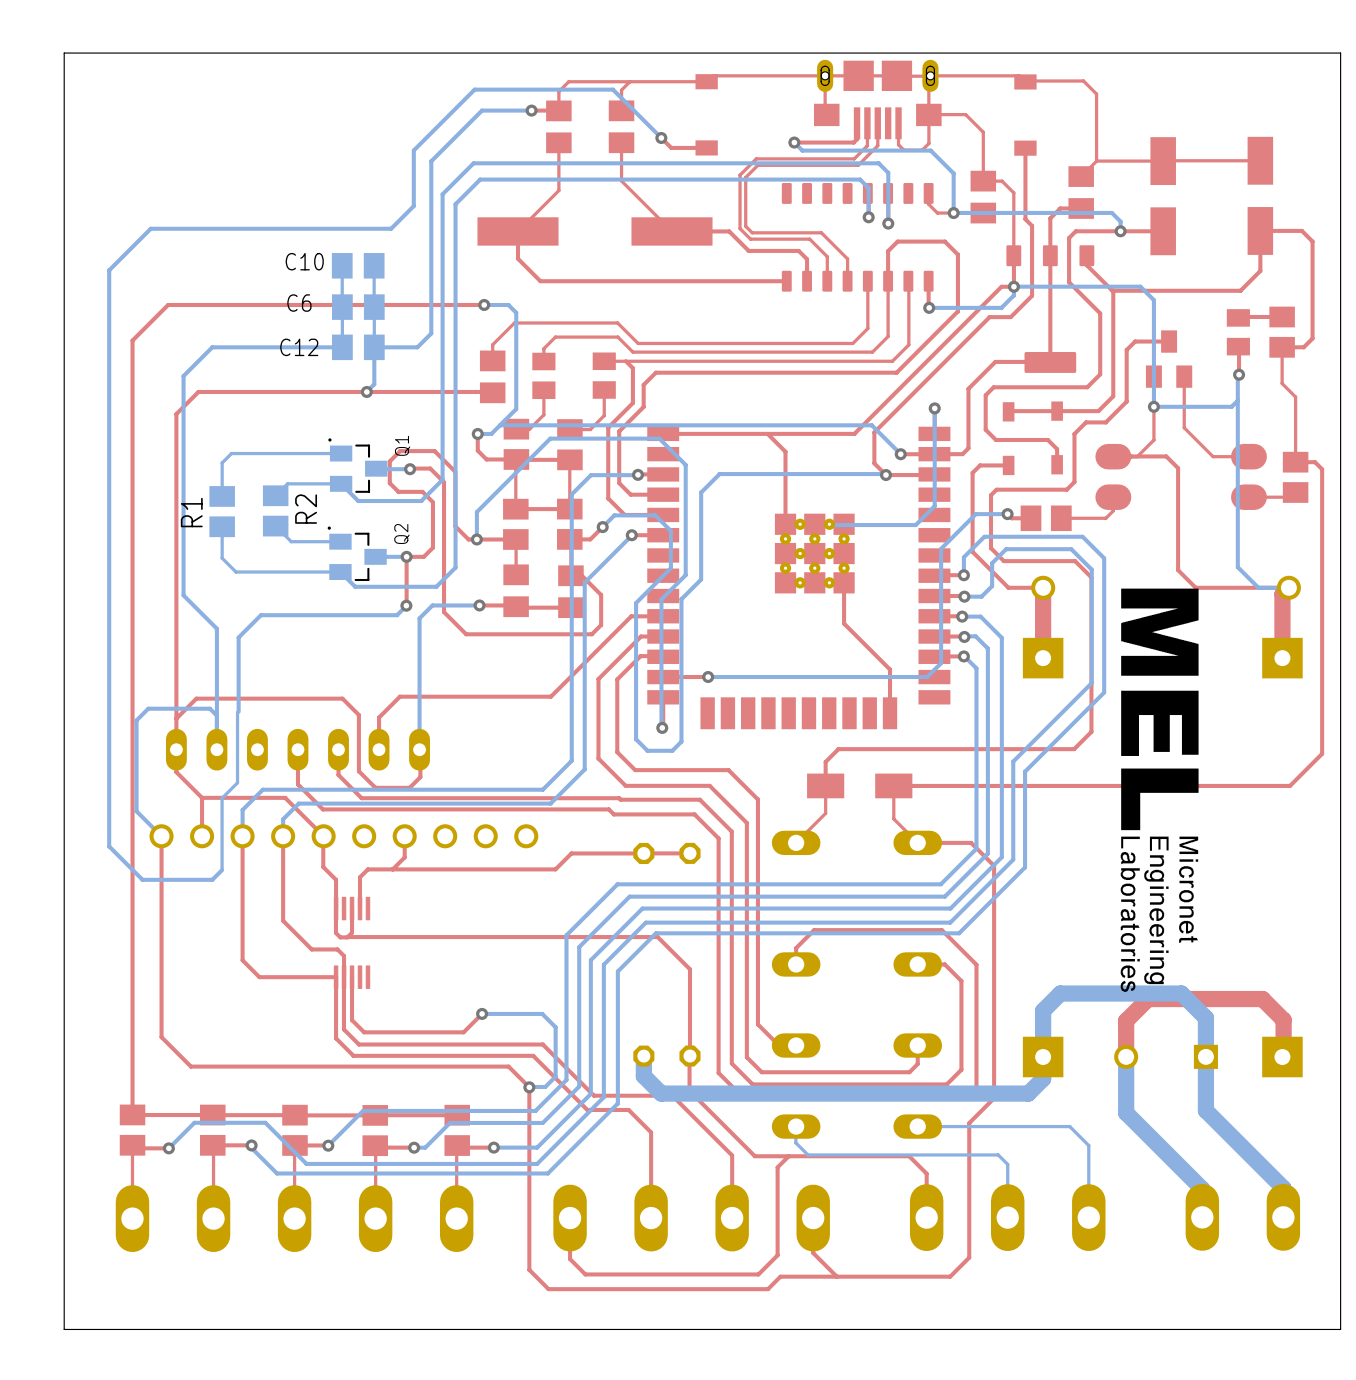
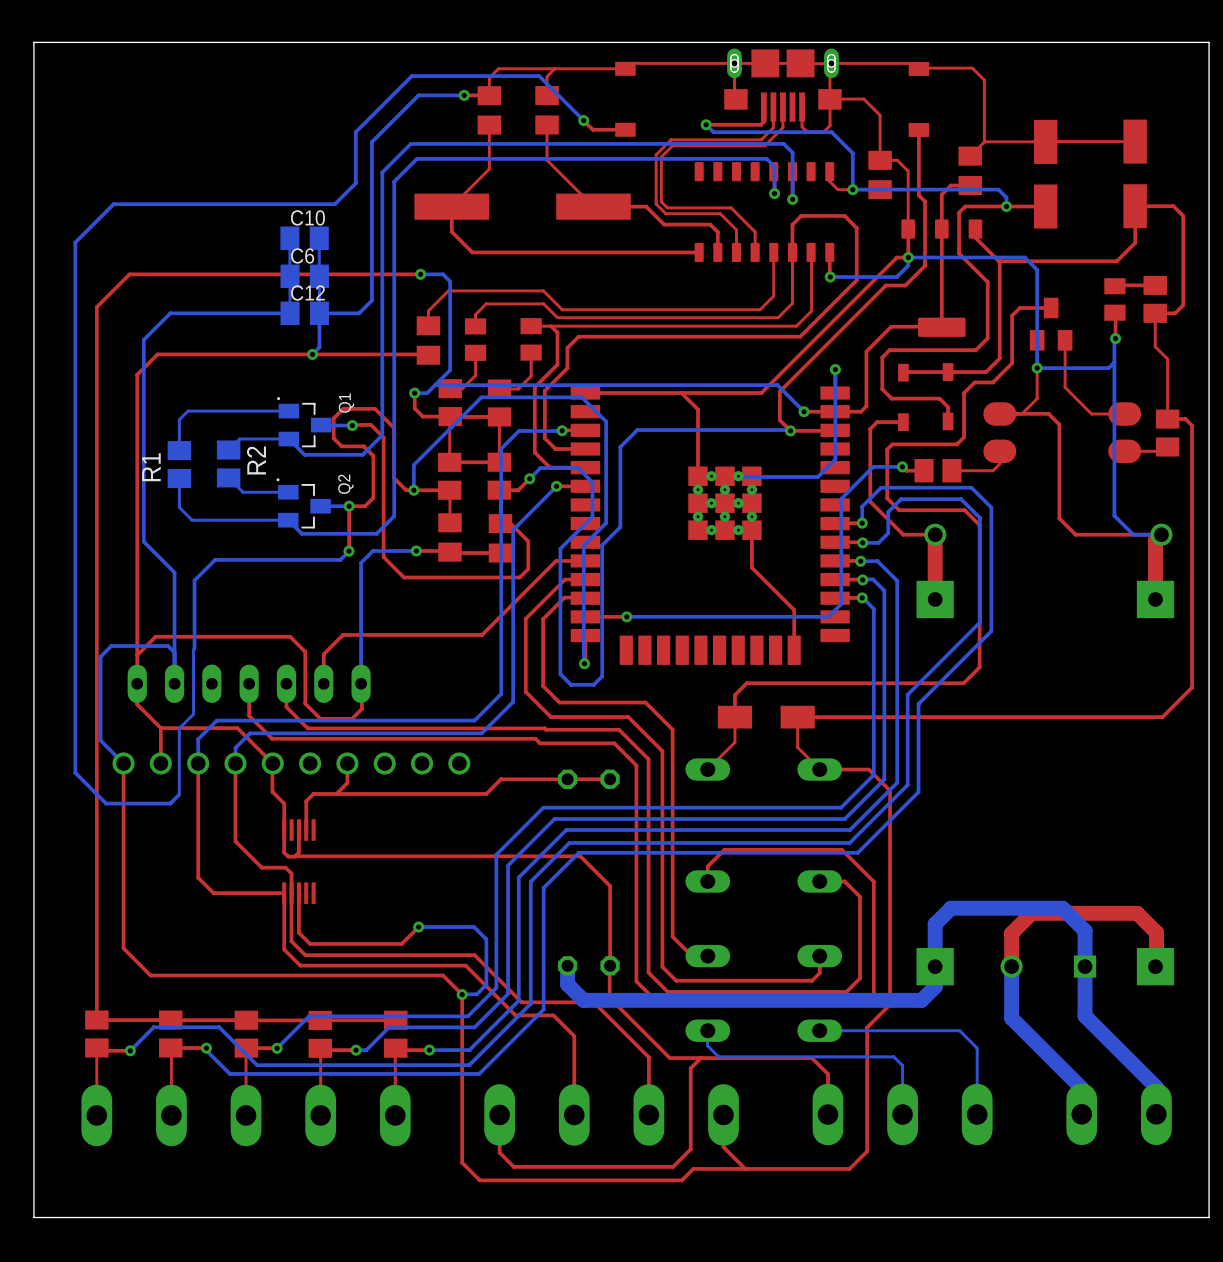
C10 name position: C10 (304, 261) -> C10 (307, 217)
C6 name position: C6 (299, 303) -> C6 (302, 255)
C12 name position: C12 (299, 347) -> C12 (307, 293)
drawing: [1120, 588, 1199, 992] -> none

